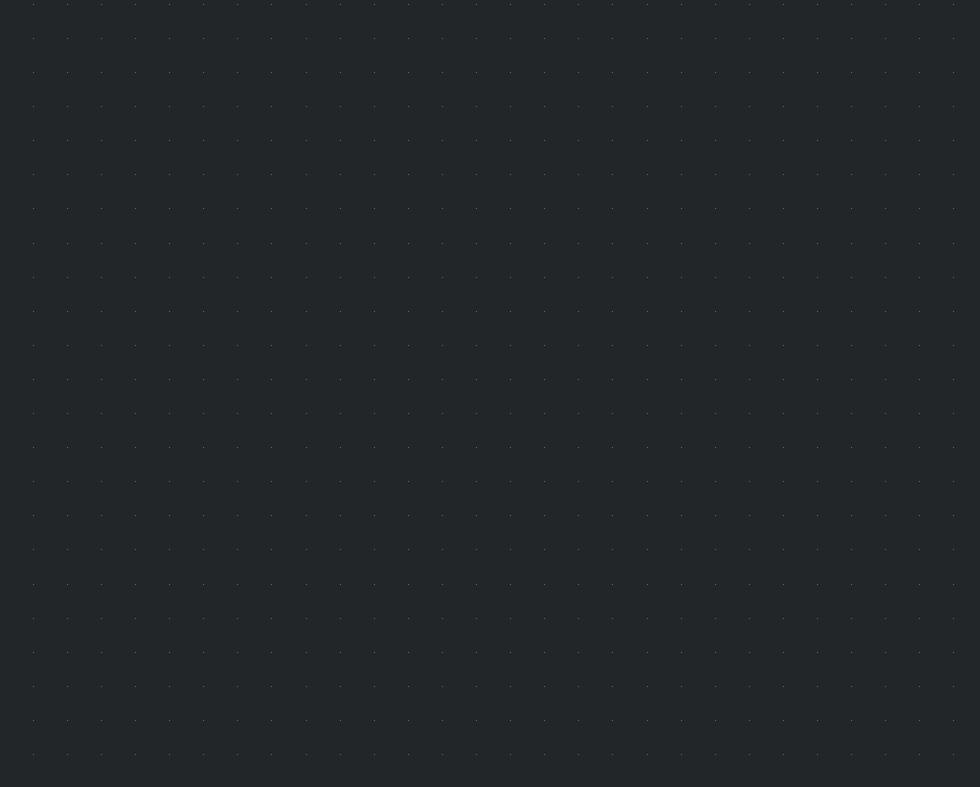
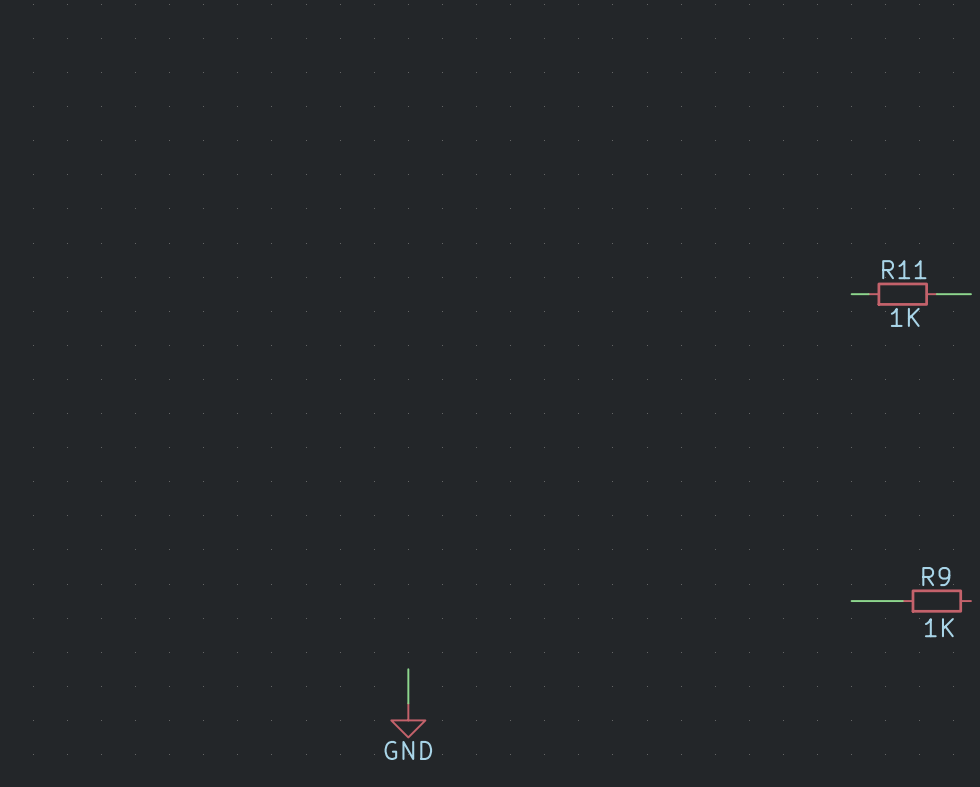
wire: none -> (851, 294) (868, 294)
R11: none -> 1K (902, 294)
wire: none -> (936, 294) (970, 294)
wire: none -> (851, 601) (902, 601)
R9: none -> 1K (936, 601)
wire: none -> (408, 669) (408, 703)
power symbol: none -> GND (408, 720)

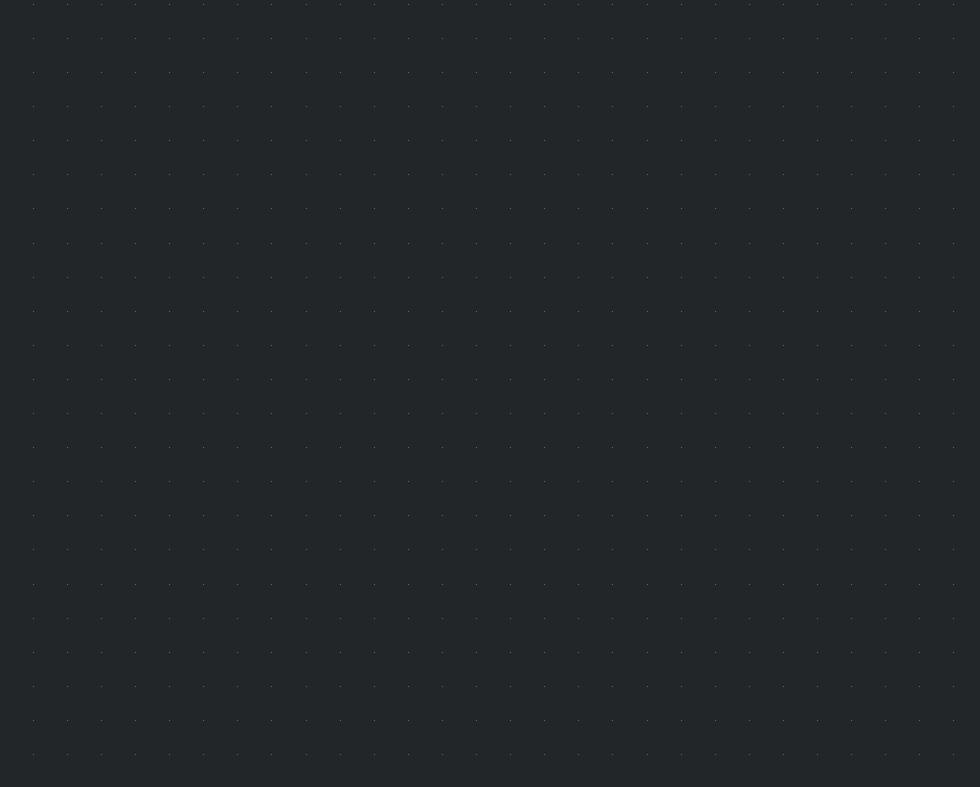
wire: (851, 294) (868, 294) -> none
R11: 1K (902, 294) -> none
wire: (936, 294) (970, 294) -> none
wire: (851, 601) (902, 601) -> none
R9: 1K (936, 601) -> none
wire: (408, 669) (408, 703) -> none
power symbol: GND (408, 720) -> none

